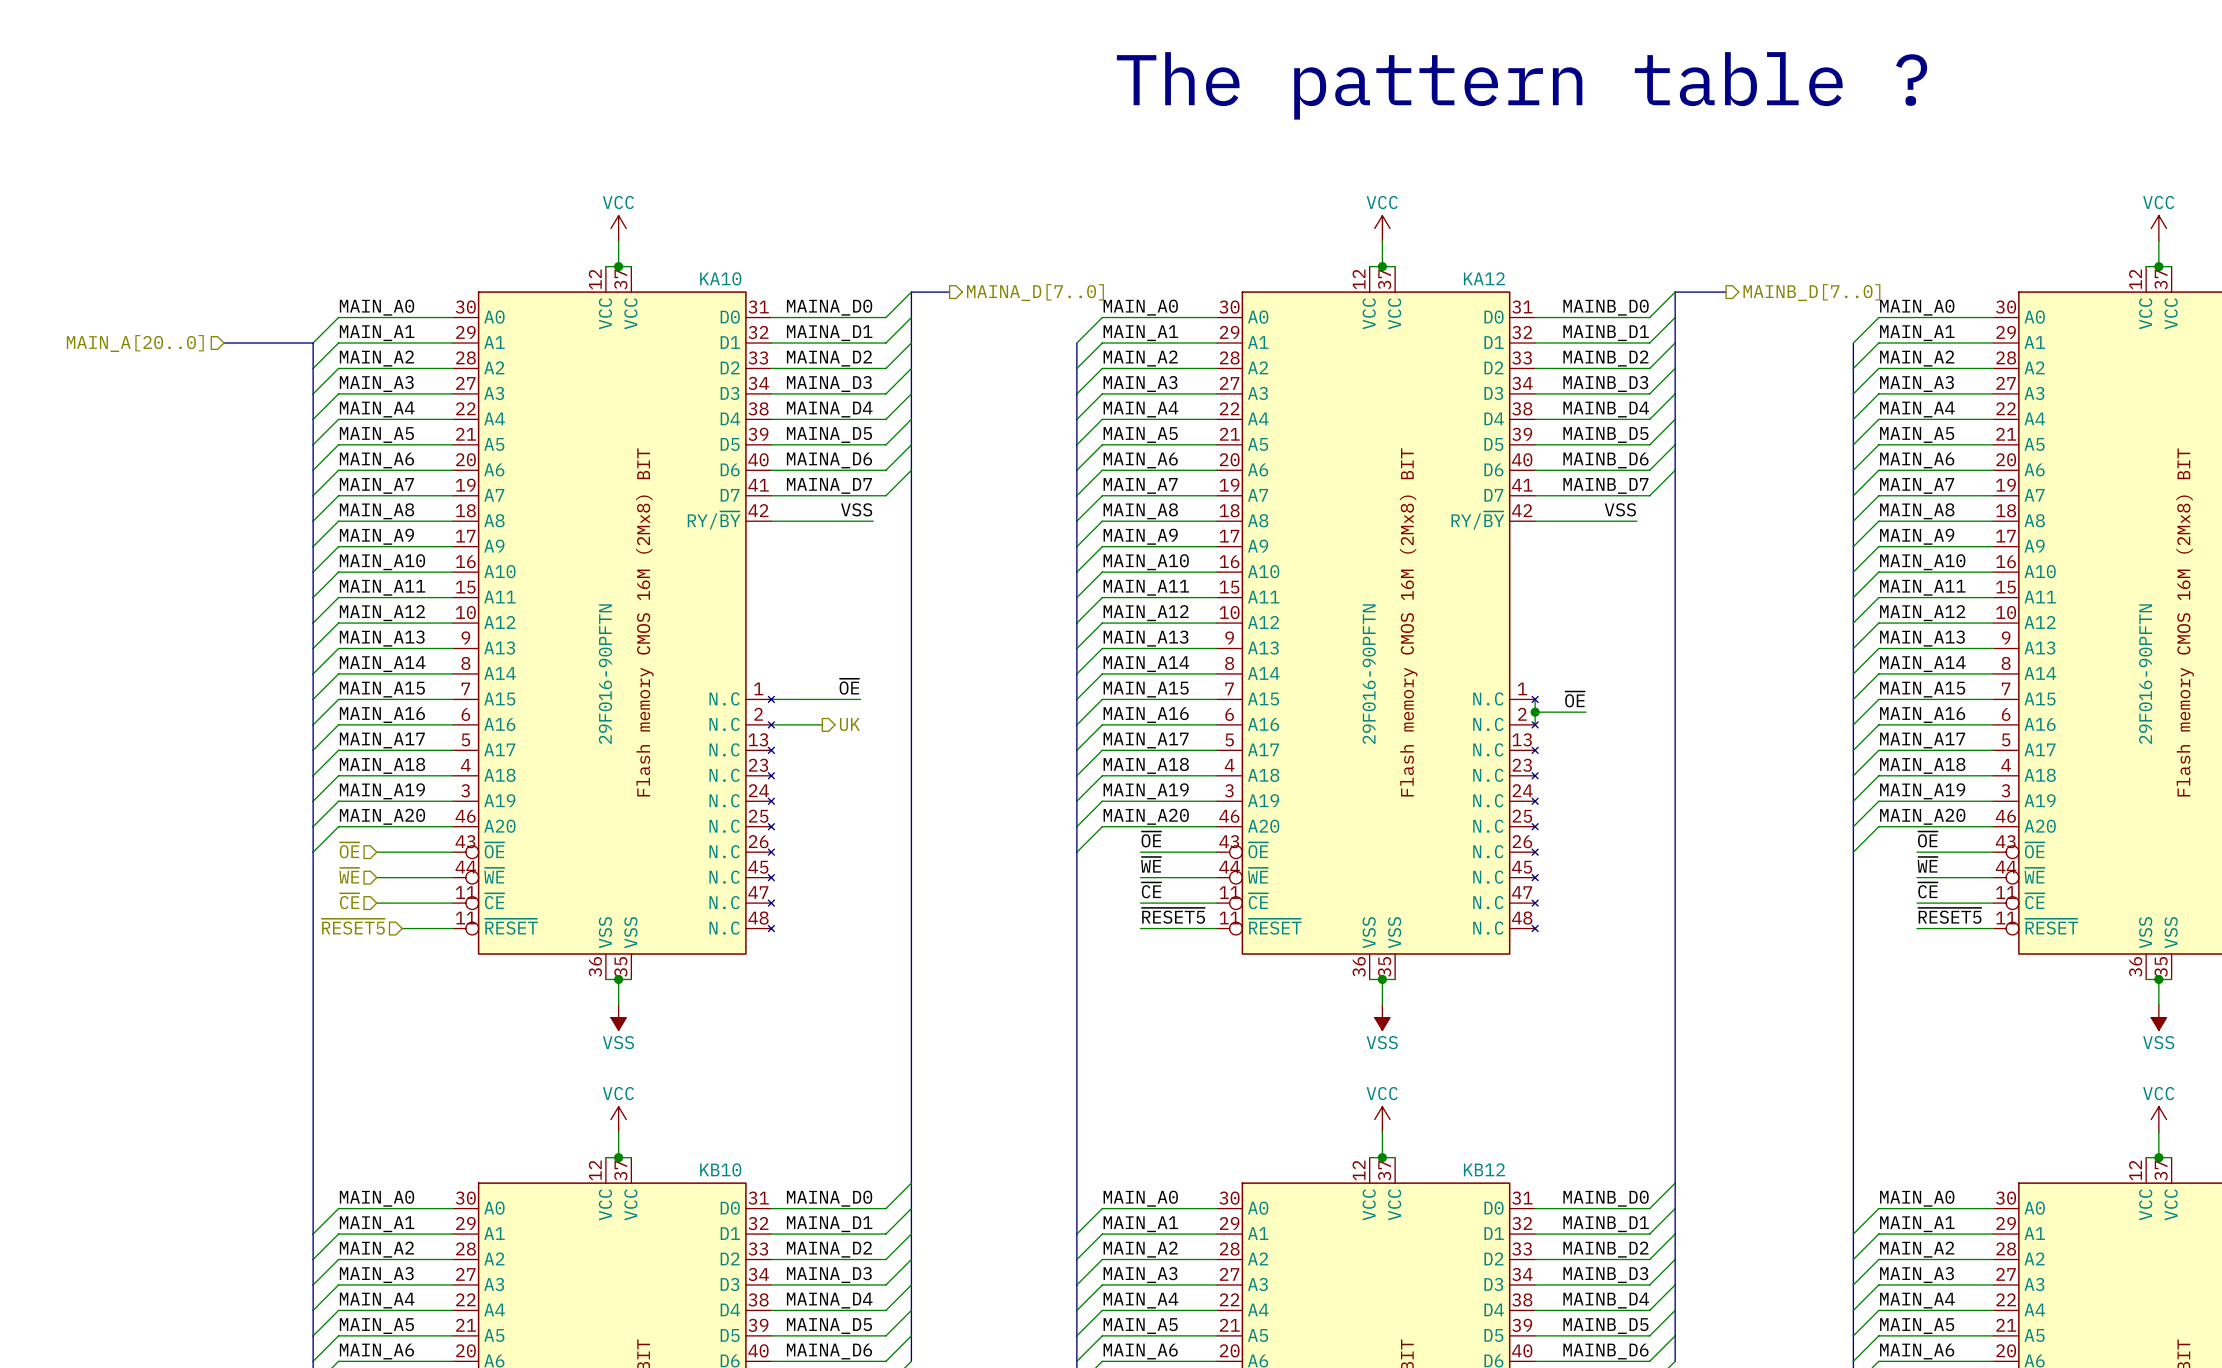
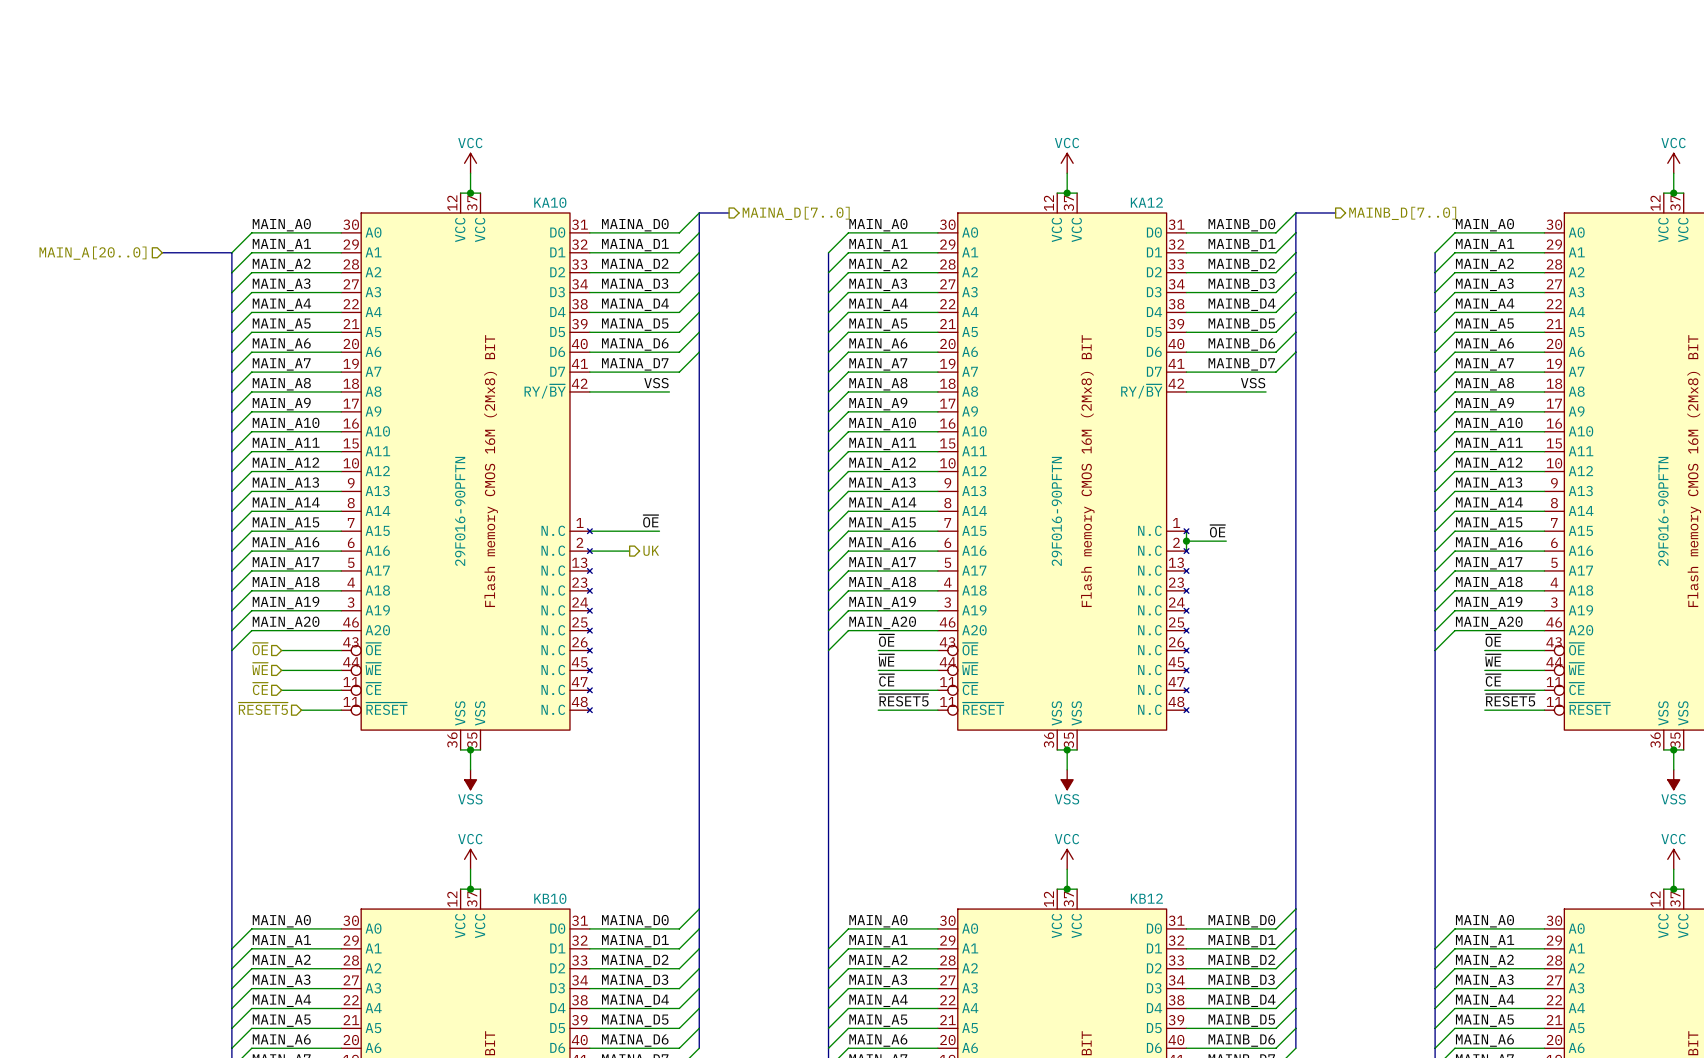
text: The pattern table ? (1522, 85) -> none

